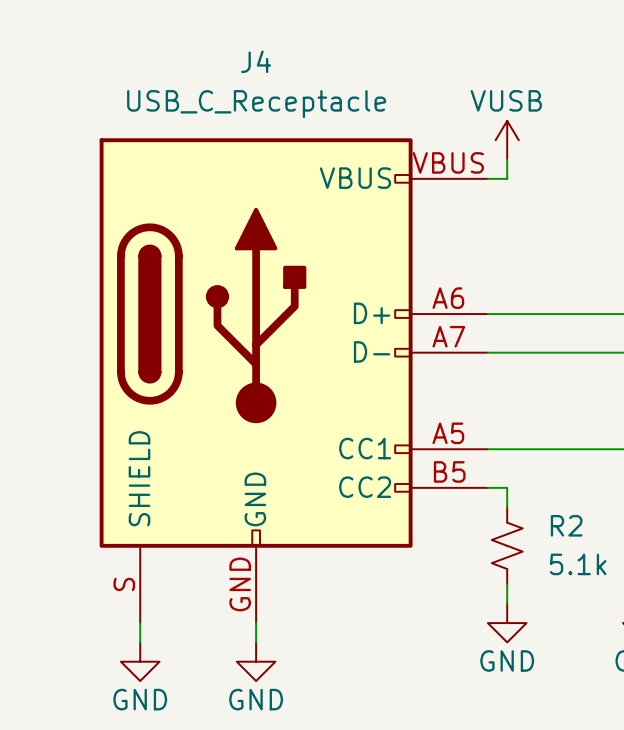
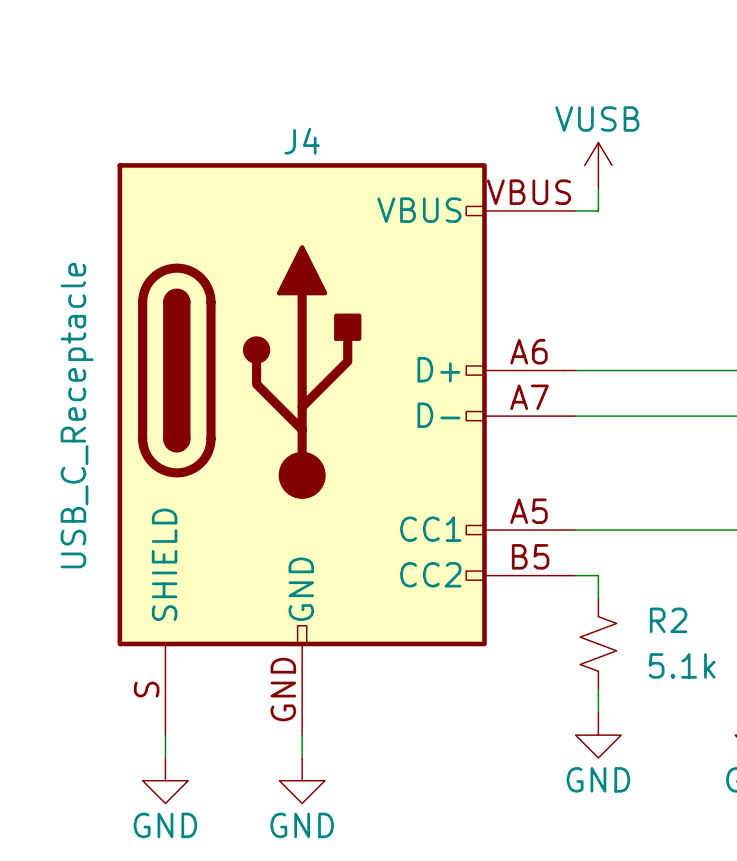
J4 name position: J4 (256, 61) -> J4 (302, 141)
J4 value rotation: 0° (256, 104) -> 90° counterclockwise (77, 415)
J4 value position: USB_C_Receptacle (256, 104) -> USB_C_Receptacle (77, 415)

